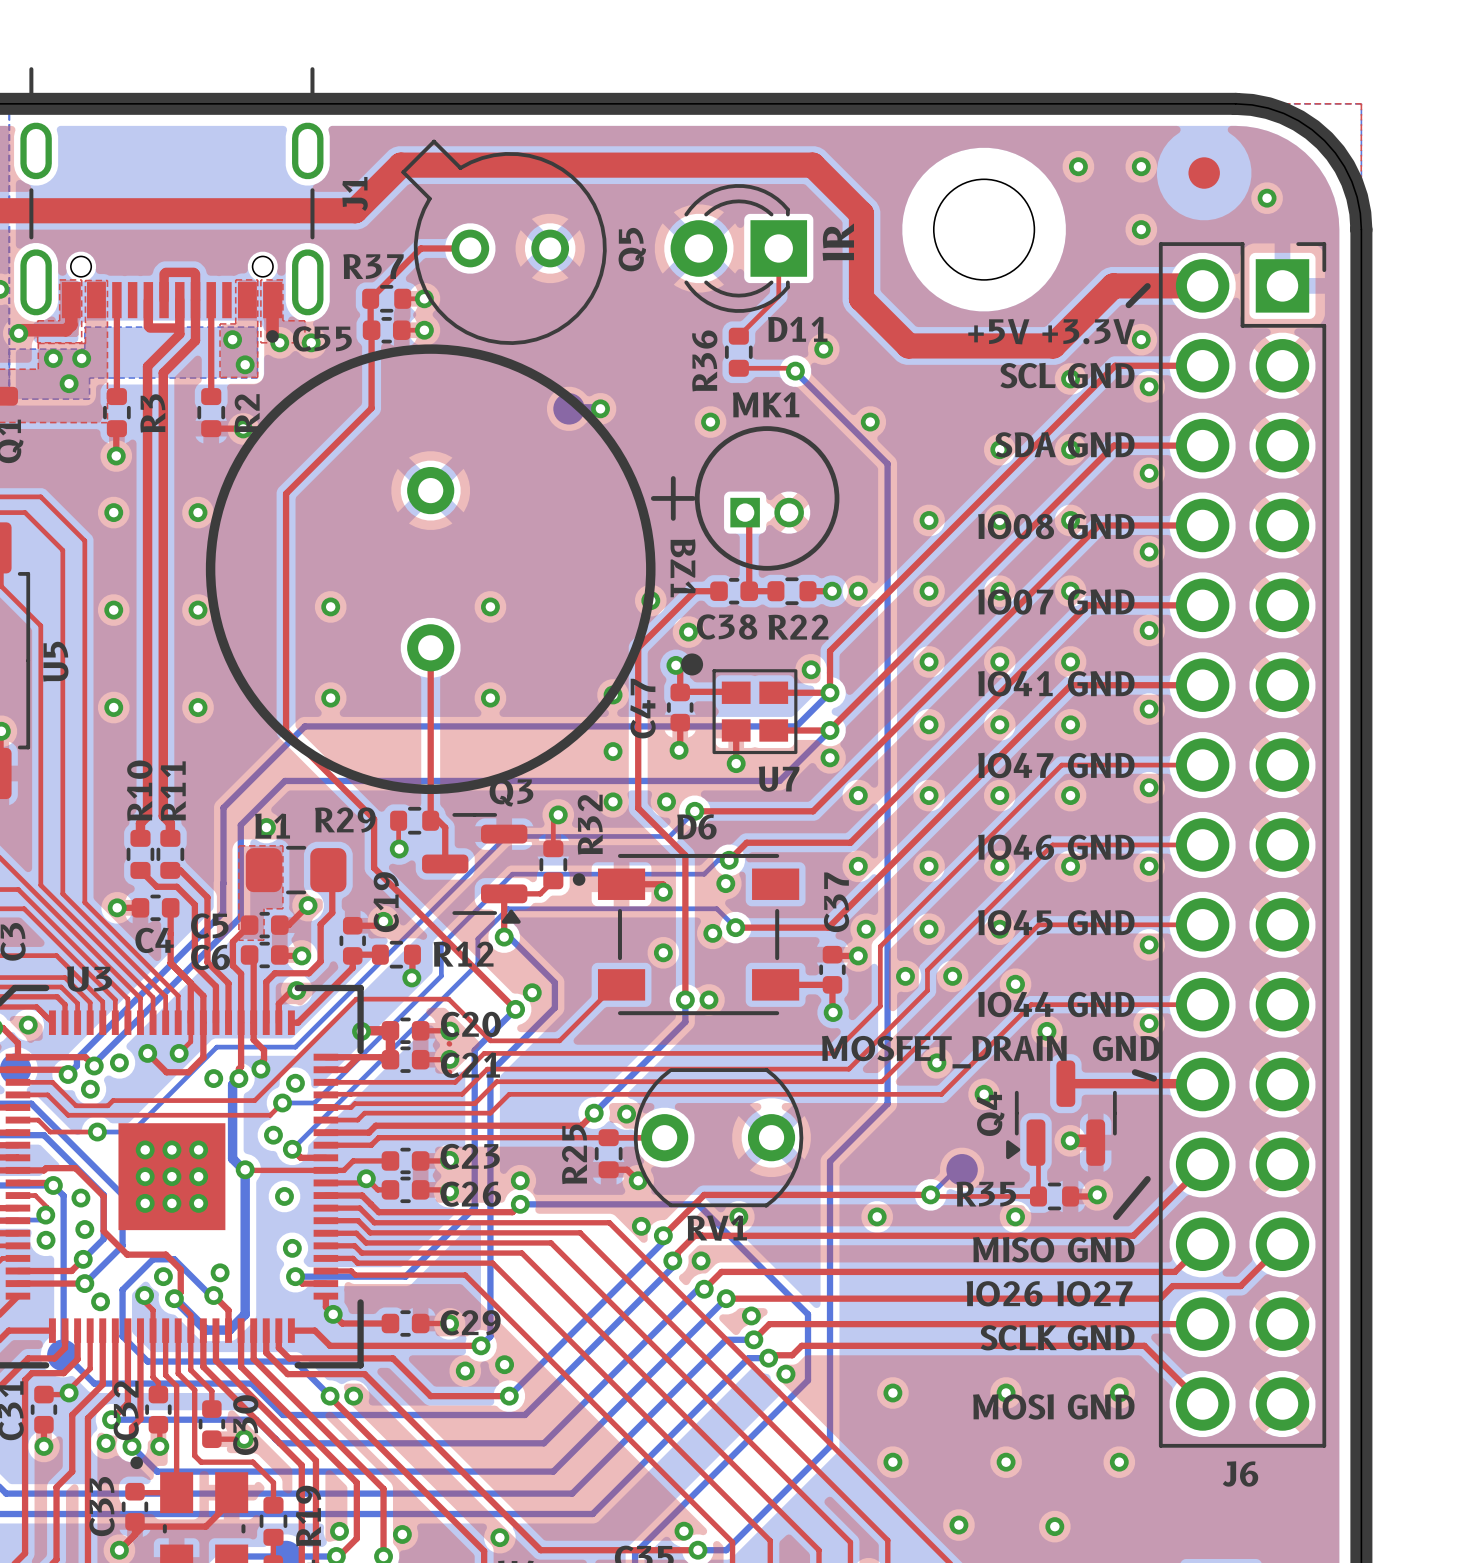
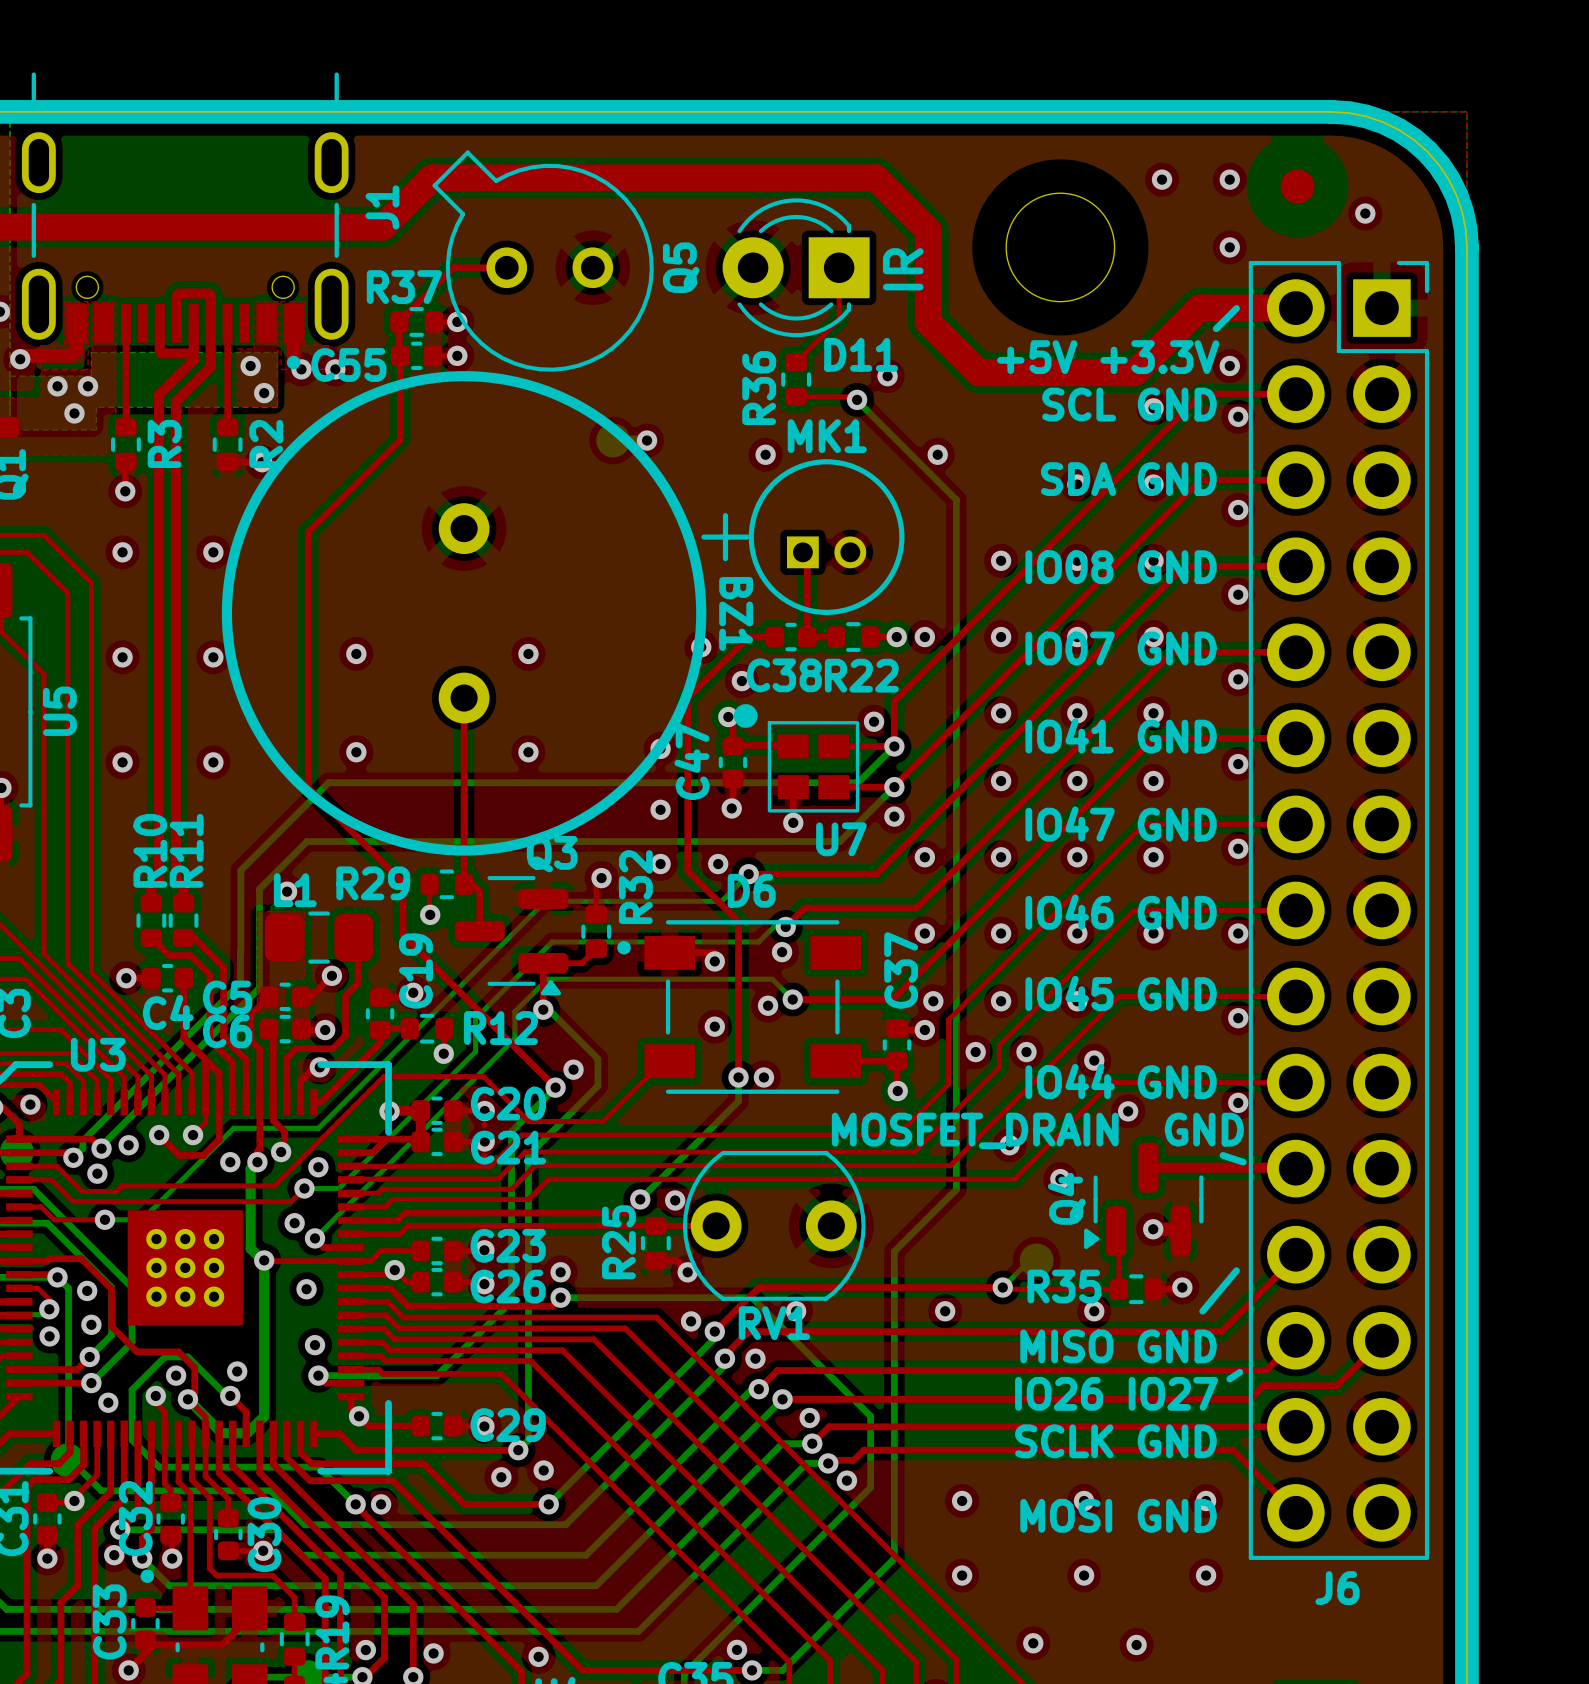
line: none -> (1239, 1372) (1229, 1379)

